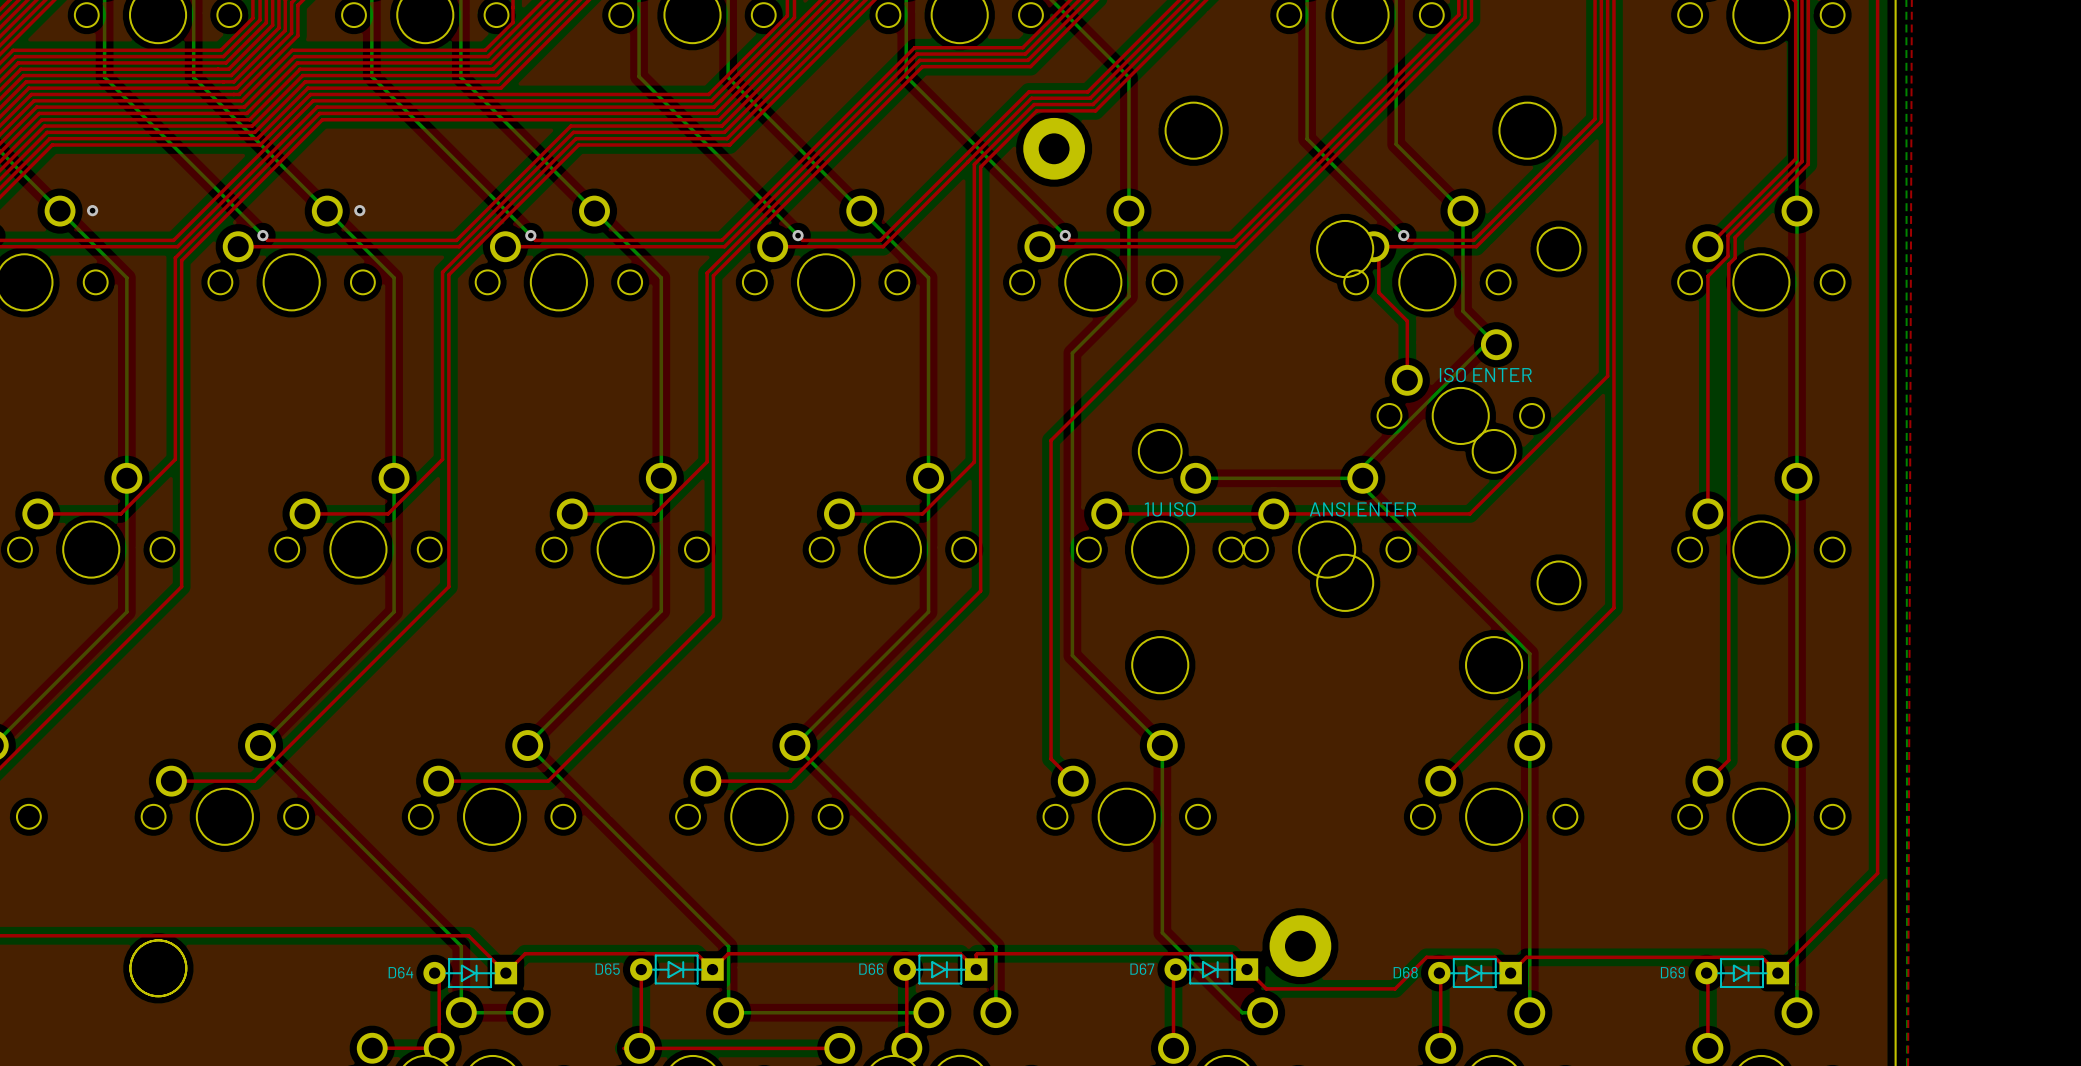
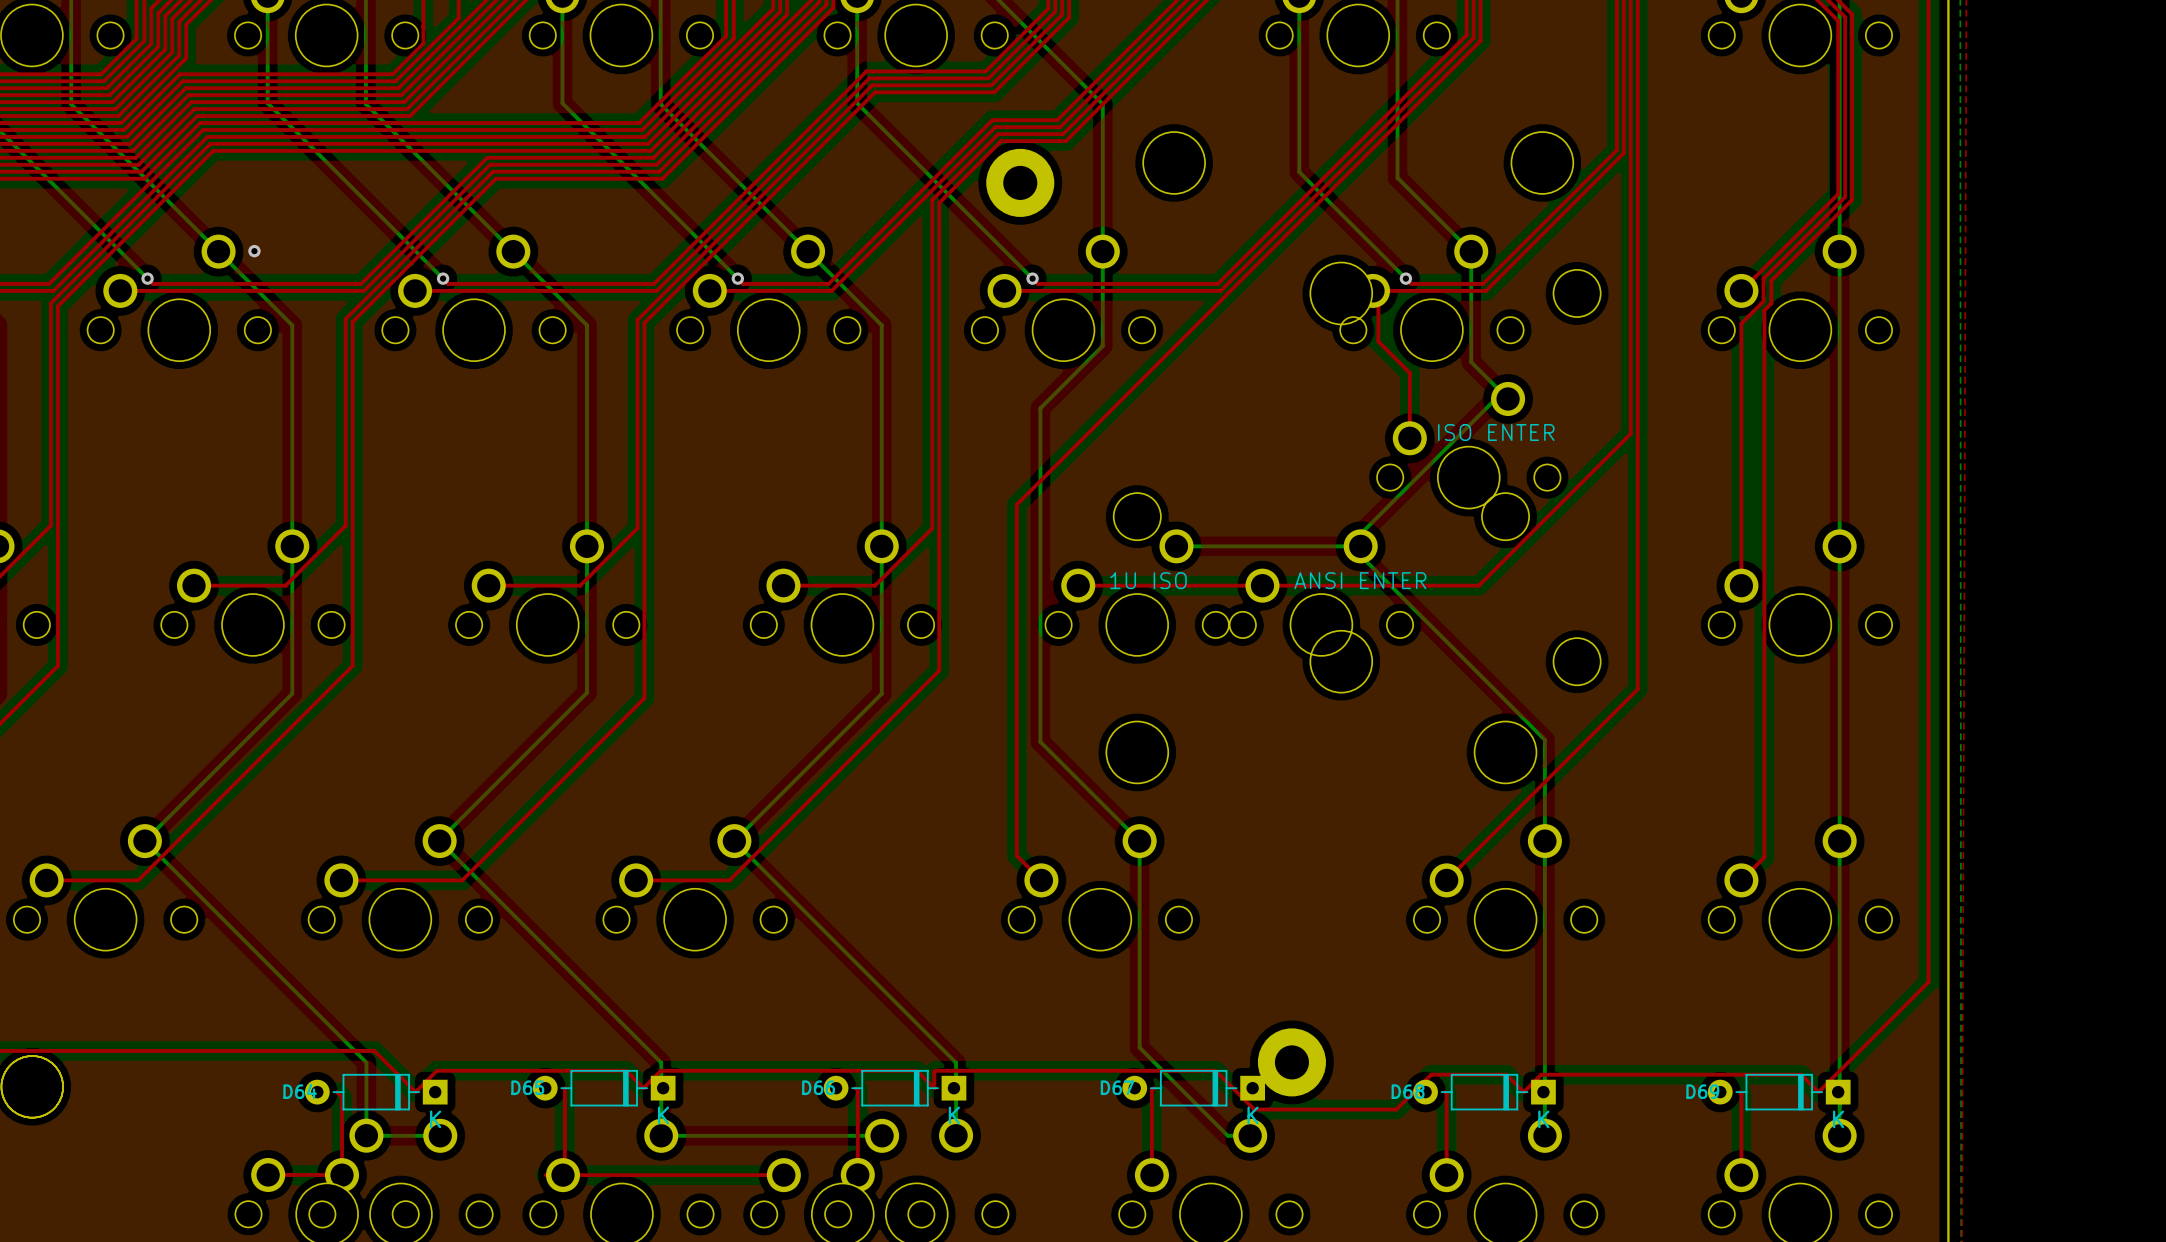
D65 footprint: [630, 954, 724, 985] -> [532, 1069, 676, 1107]
D66 footprint: [893, 954, 988, 985] -> [823, 1069, 967, 1107]
D67 footprint: [1164, 954, 1259, 985] -> [1122, 1069, 1266, 1107]
D64 footprint: [423, 958, 518, 988] -> [304, 1073, 448, 1111]
D68 footprint: [1428, 958, 1522, 988] -> [1413, 1073, 1556, 1111]
D69 footprint: [1695, 958, 1790, 988] -> [1707, 1073, 1851, 1111]

